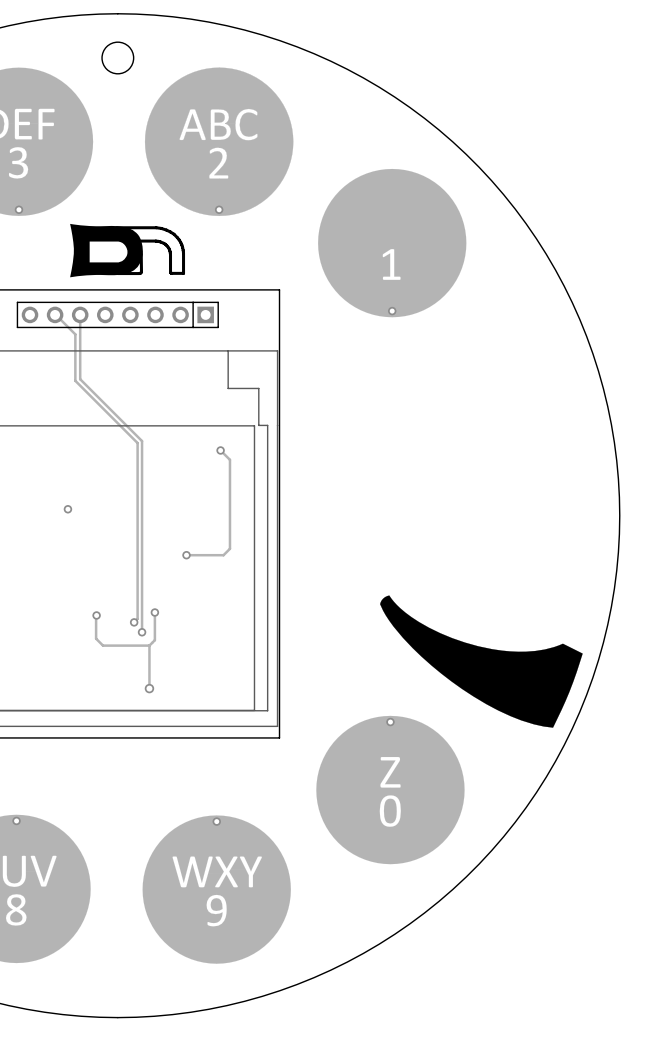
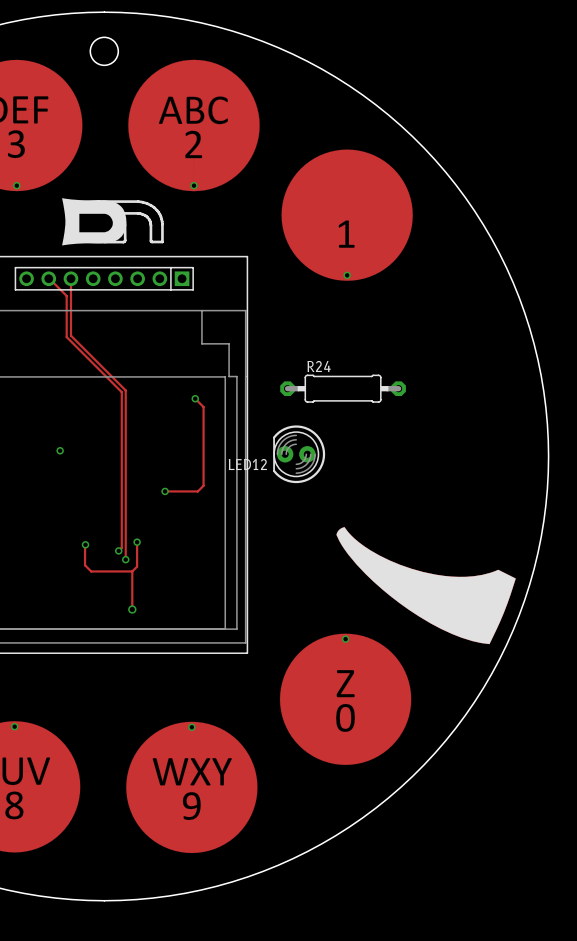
R24: none -> (343, 388)
LED12: none -> (299, 454)

